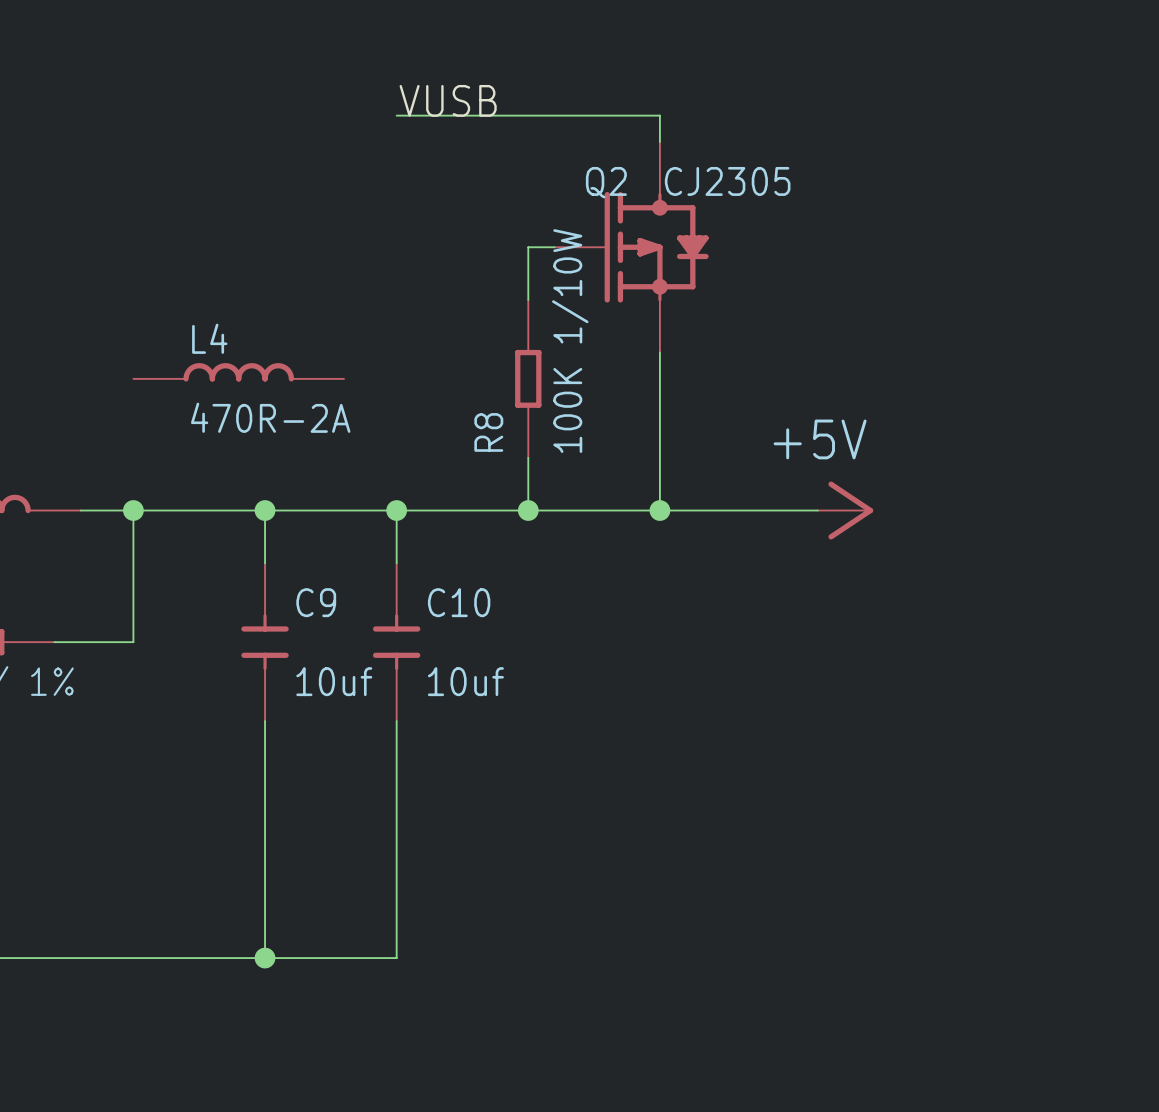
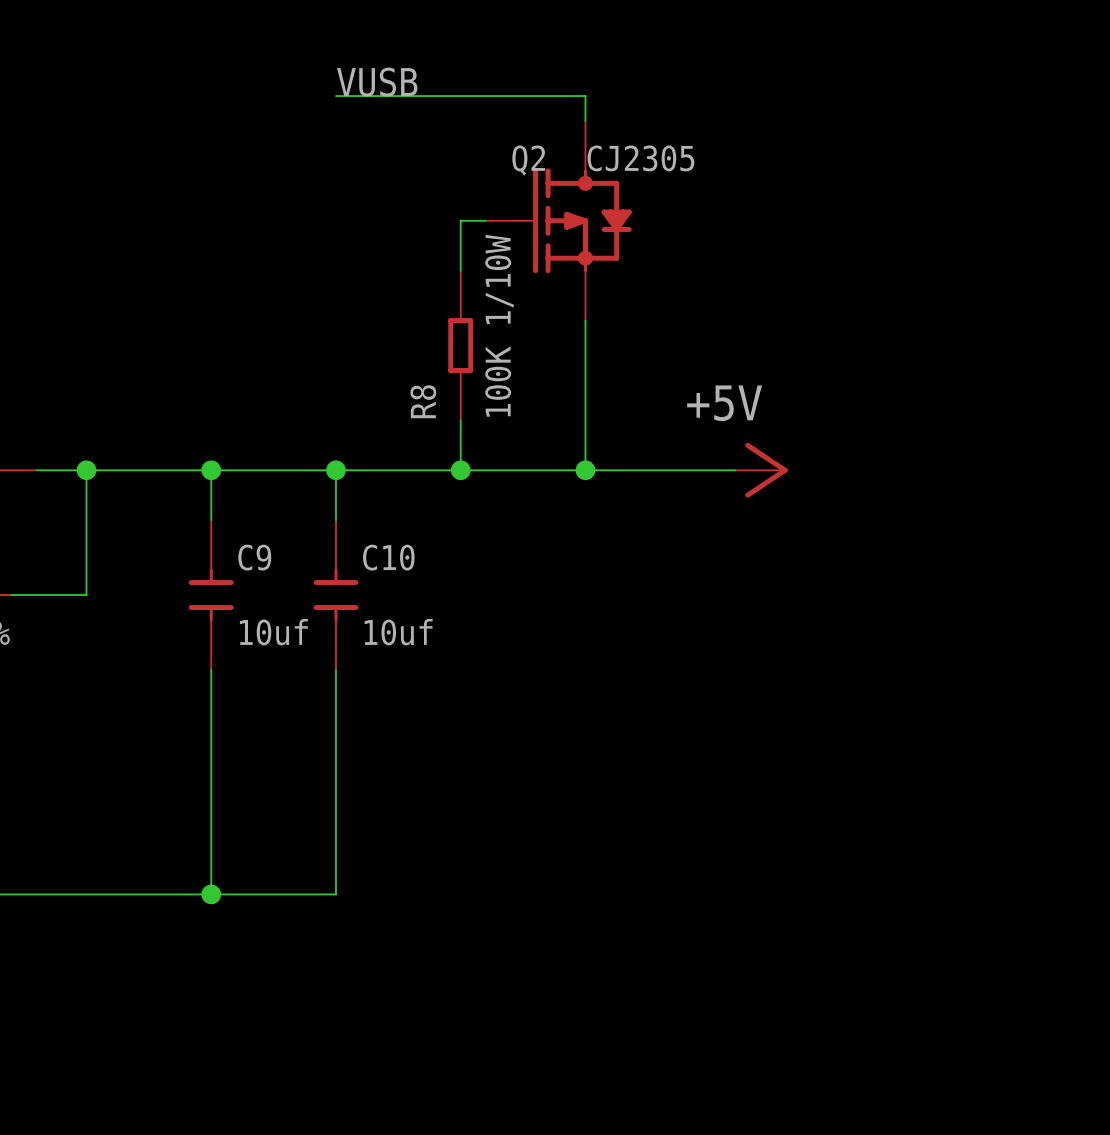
L4: 470R-2A (238, 372) -> none

